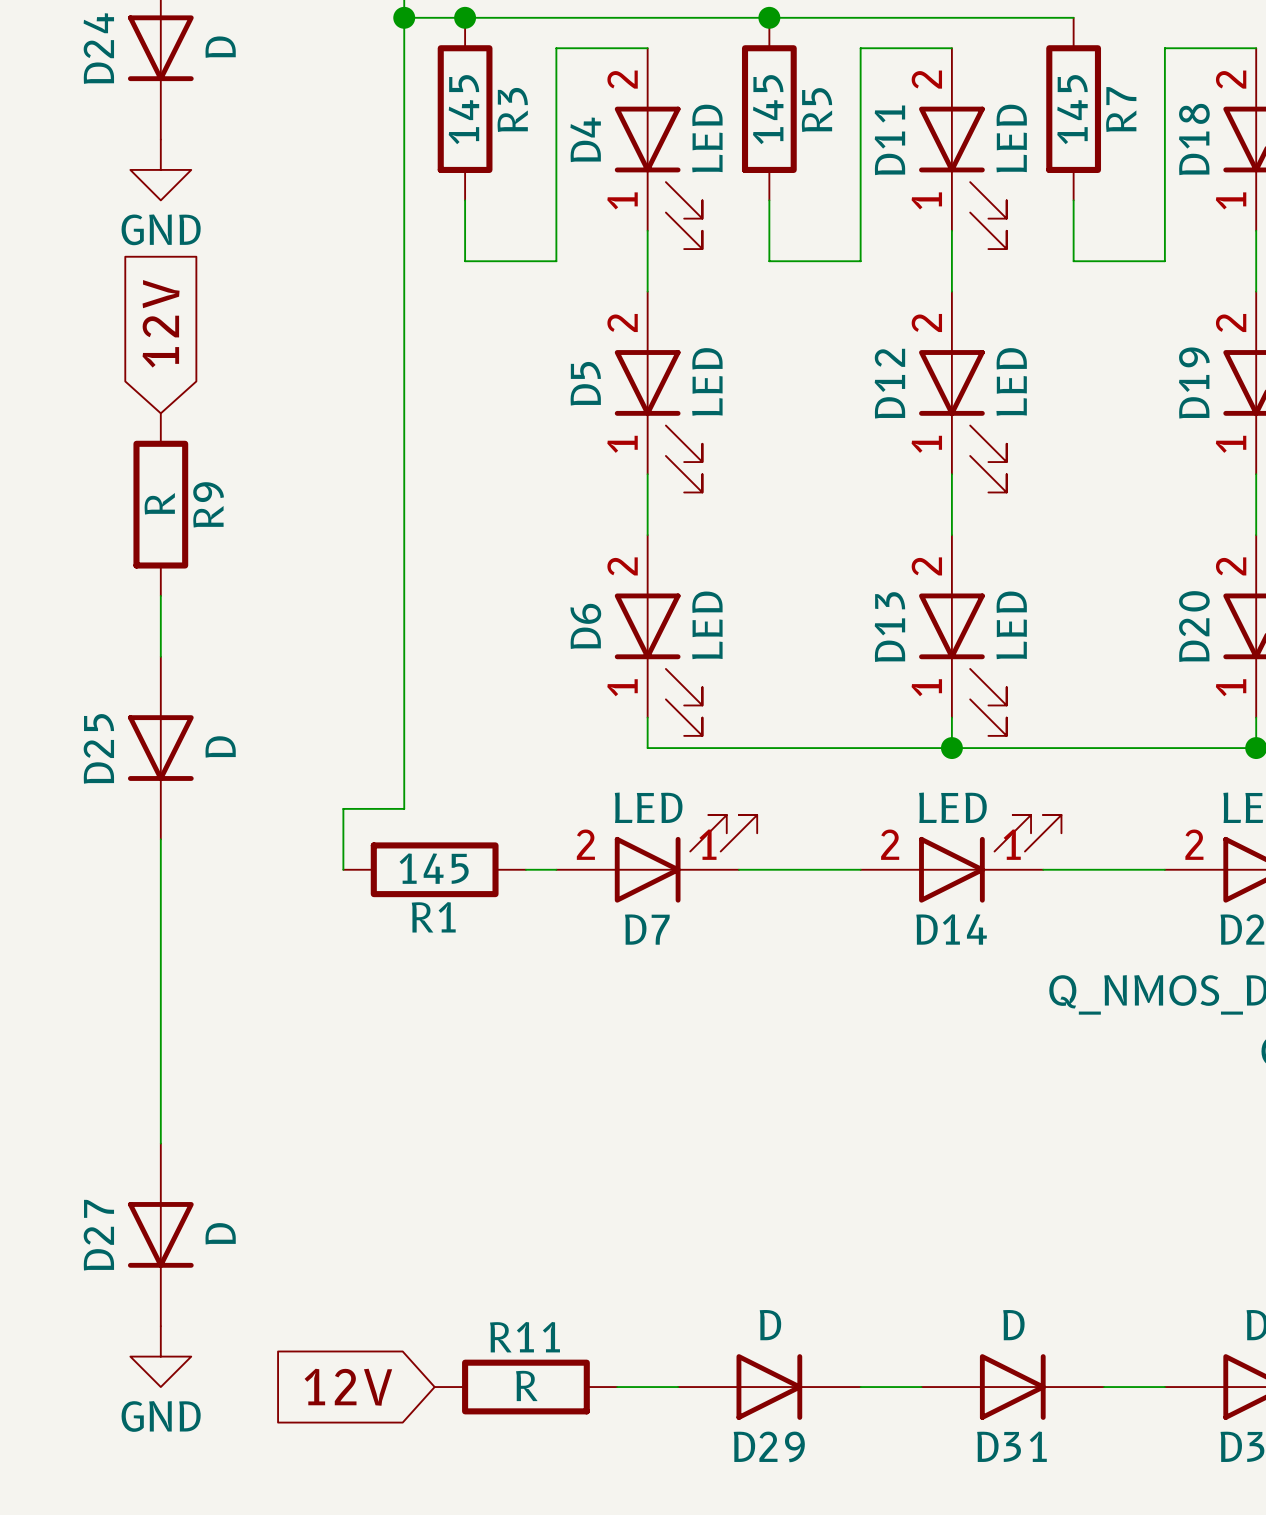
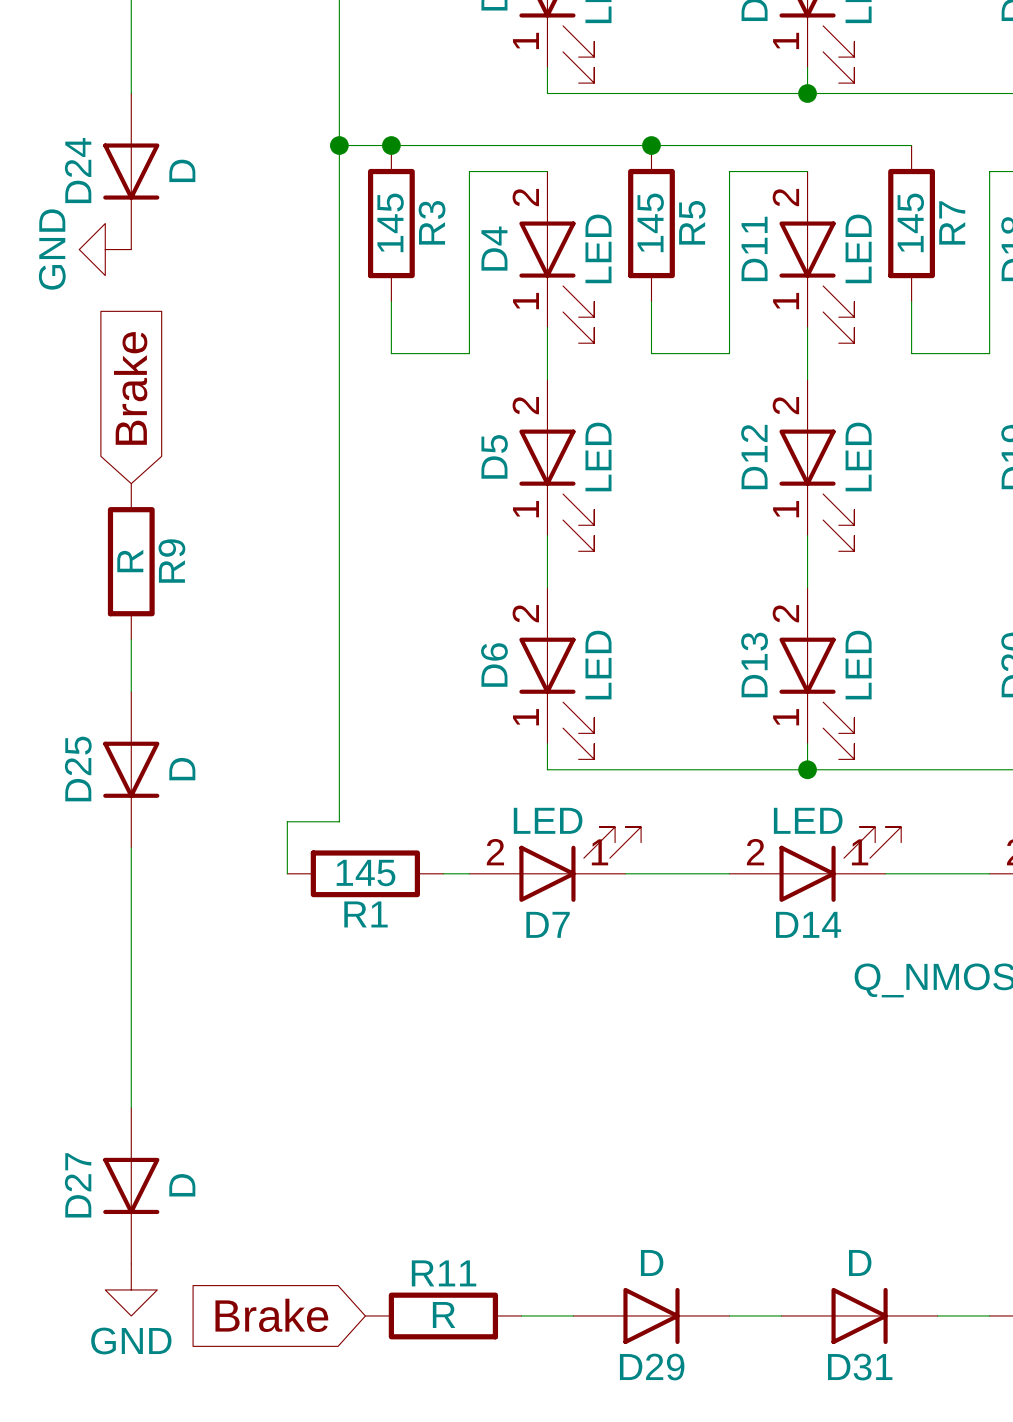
power symbol rotation: 0° (160, 169) -> 90° clockwise (105, 249)
power symbol position: GND (160, 169) -> GND (105, 249)
global label: 12V (161, 323) -> Brake (130, 388)
global label: 12V (348, 1387) -> Brake (271, 1315)

